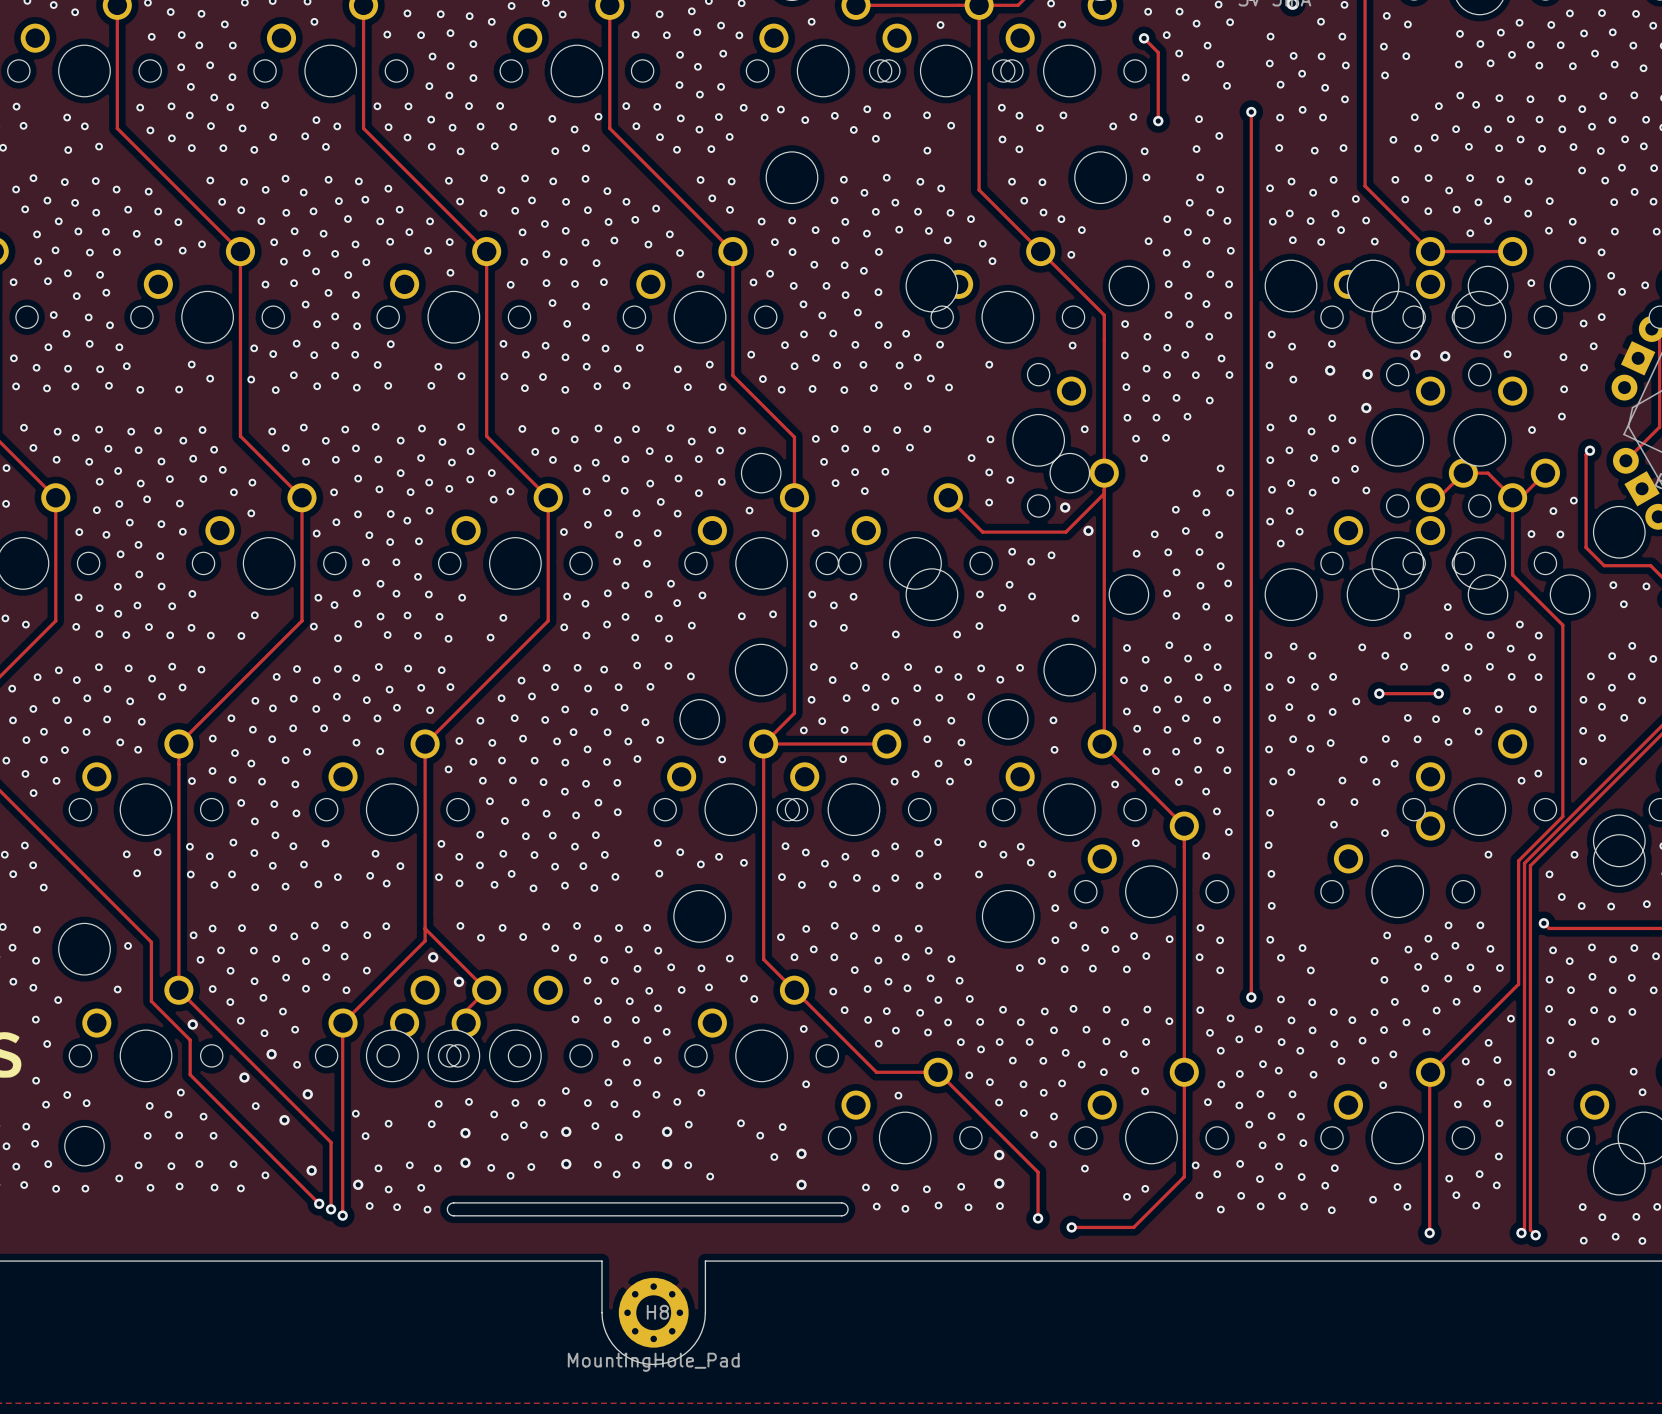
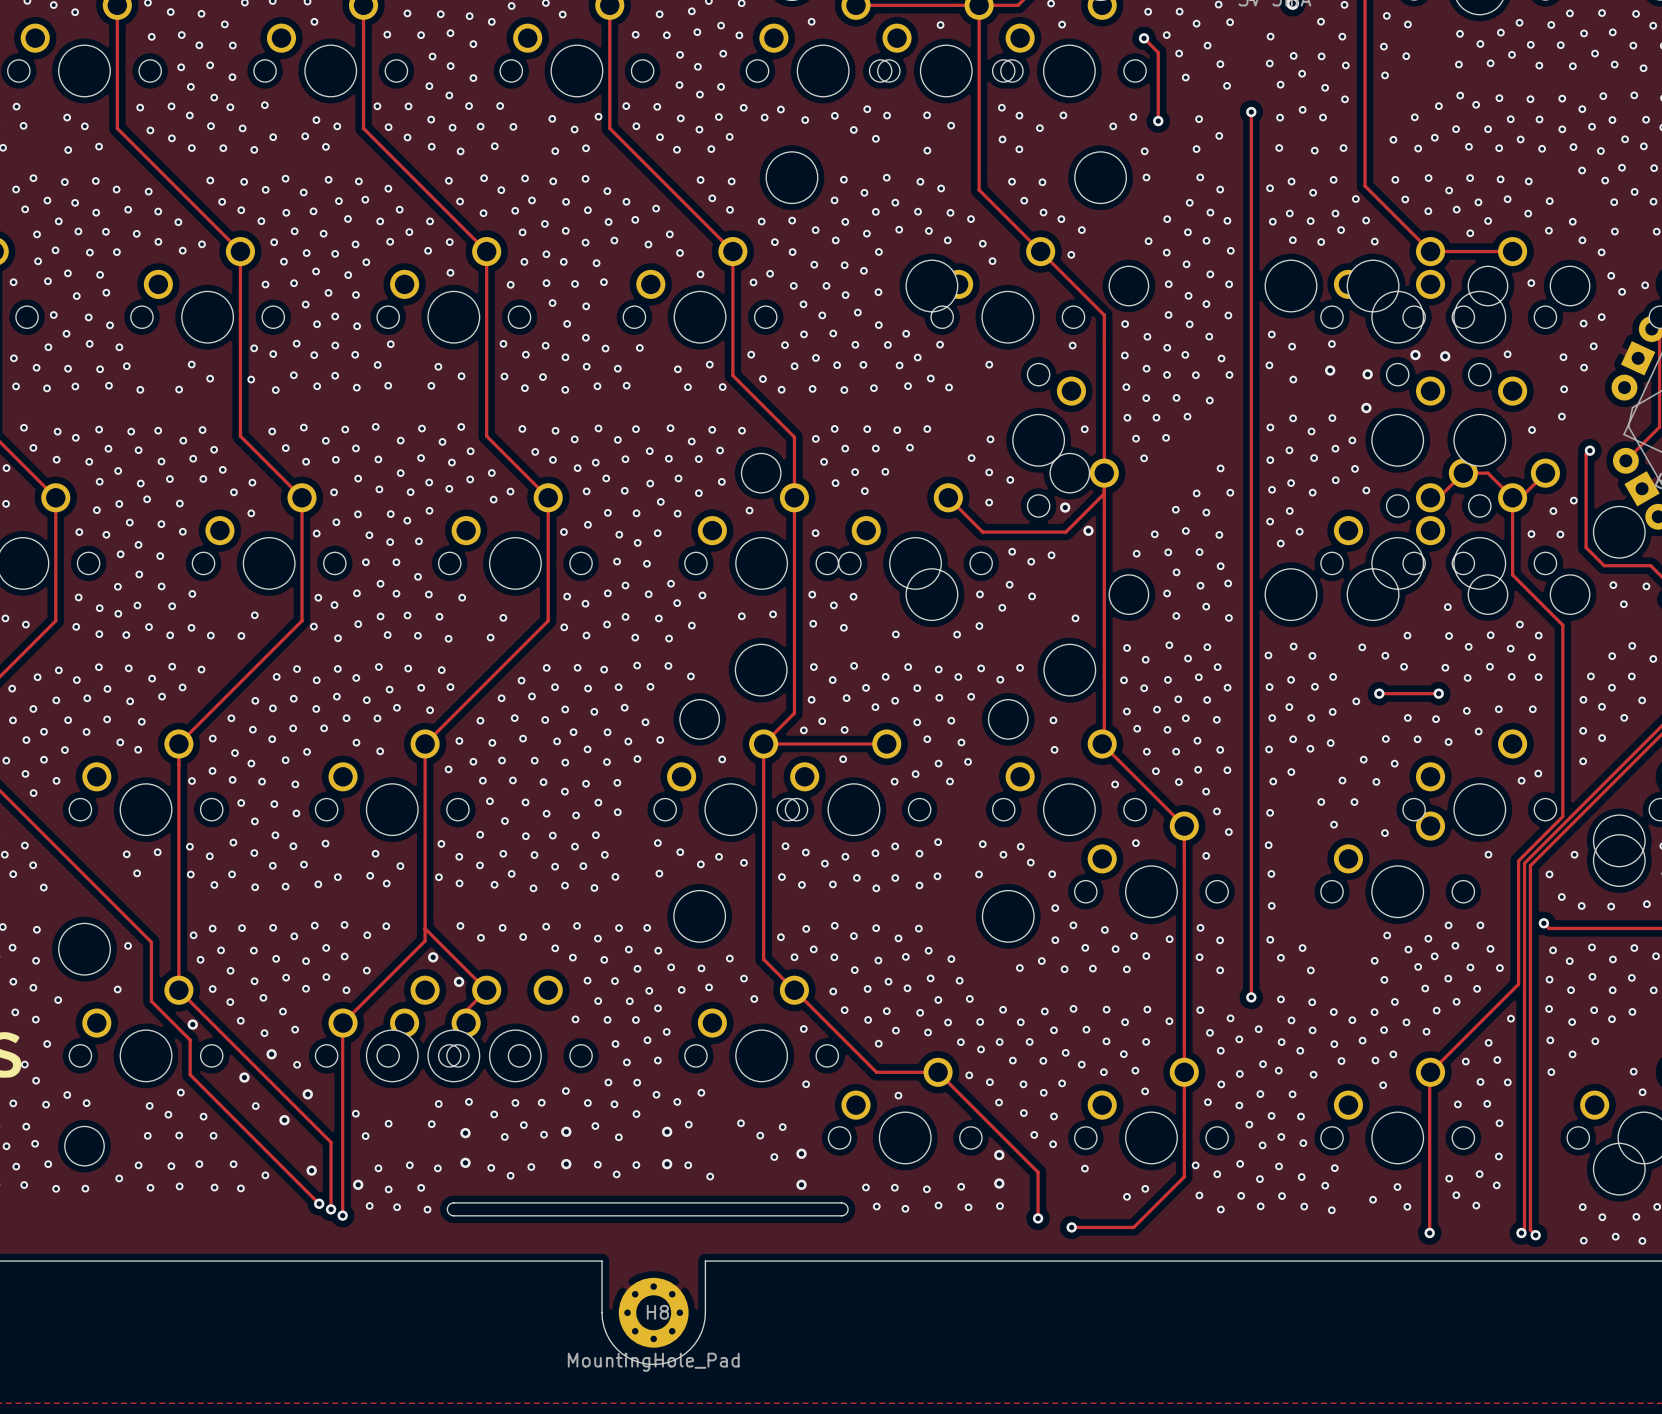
via: none -> (15, 1012)
via: none -> (24, 1064)
via: none -> (13, 1103)

